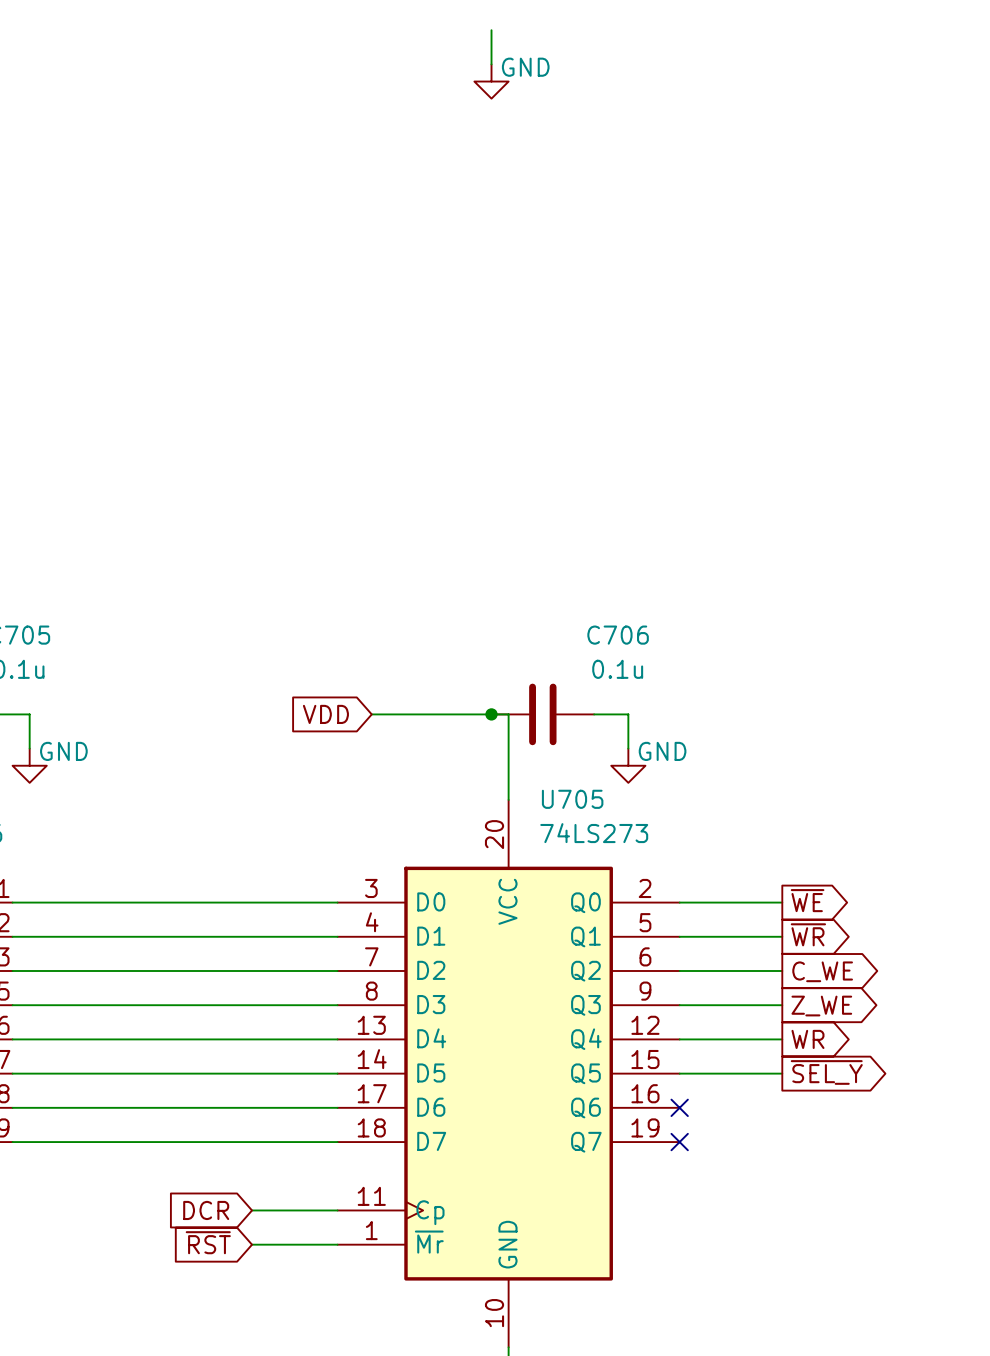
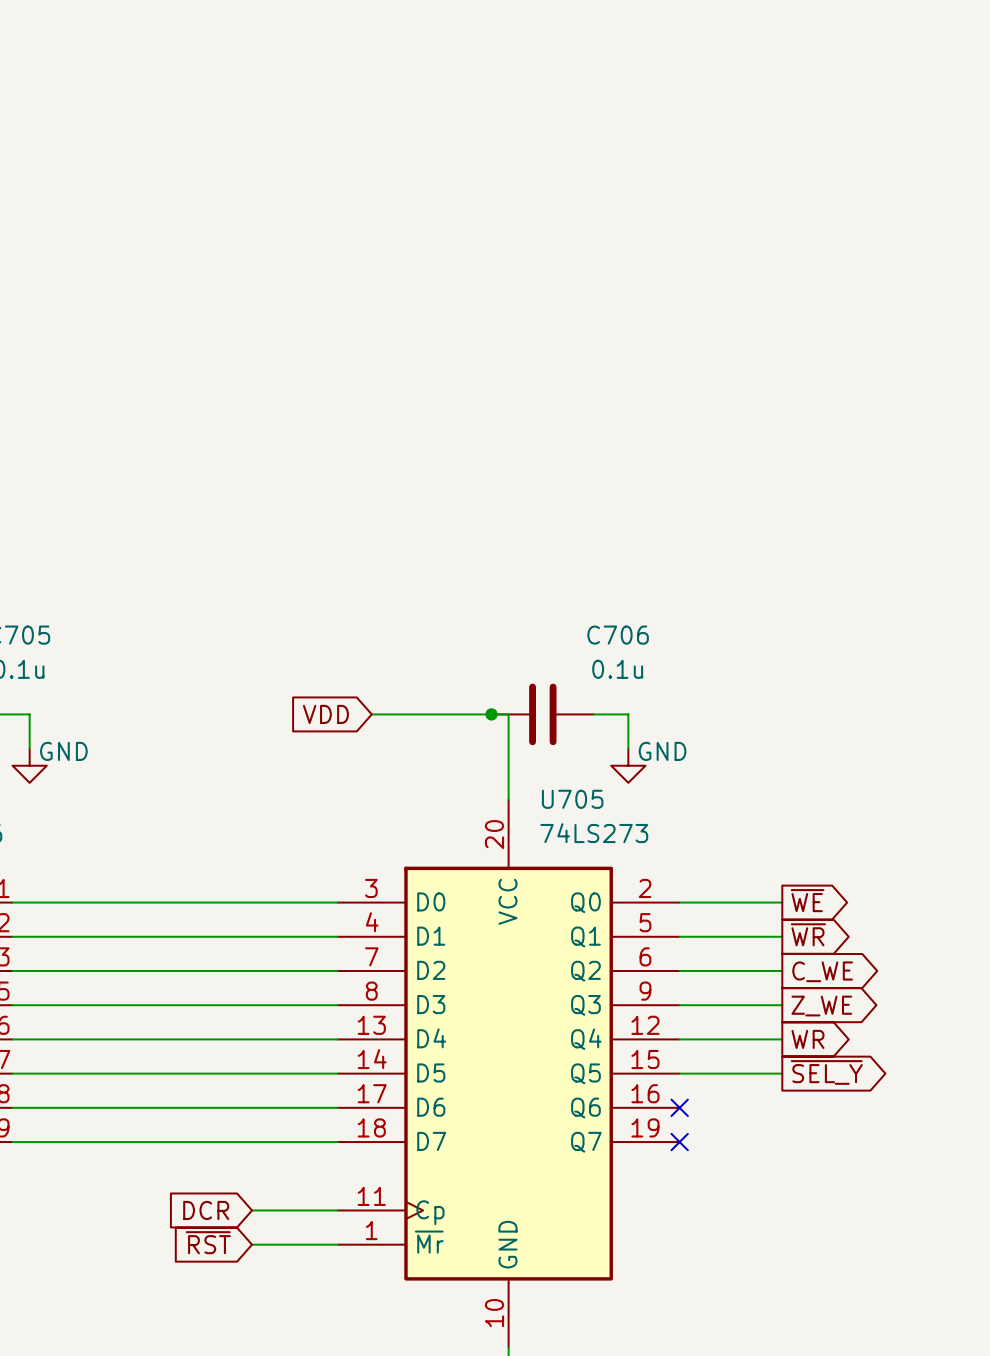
wire: (491, 30) (491, 64) -> none
power symbol: GND (491, 81) -> none

